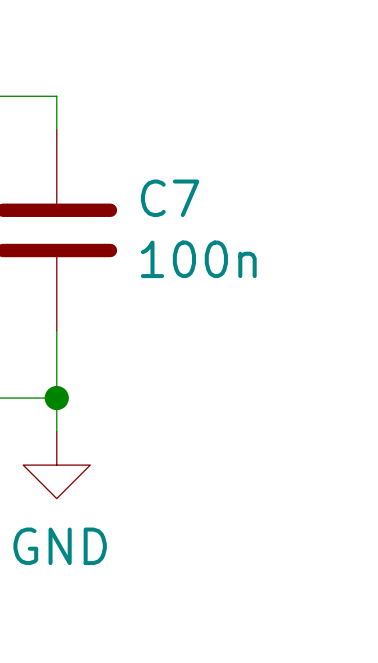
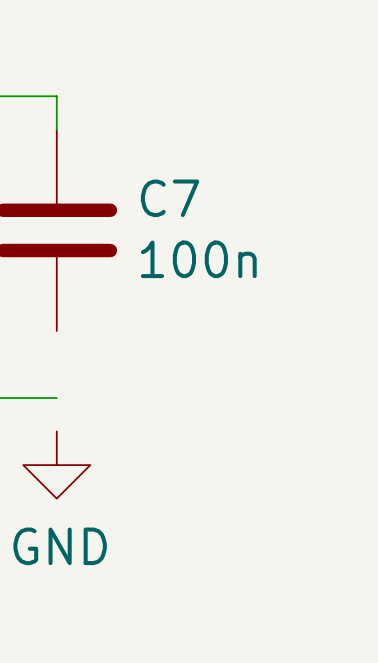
wire: (56, 330) (56, 431) -> none
junction: (56, 398) -> none

